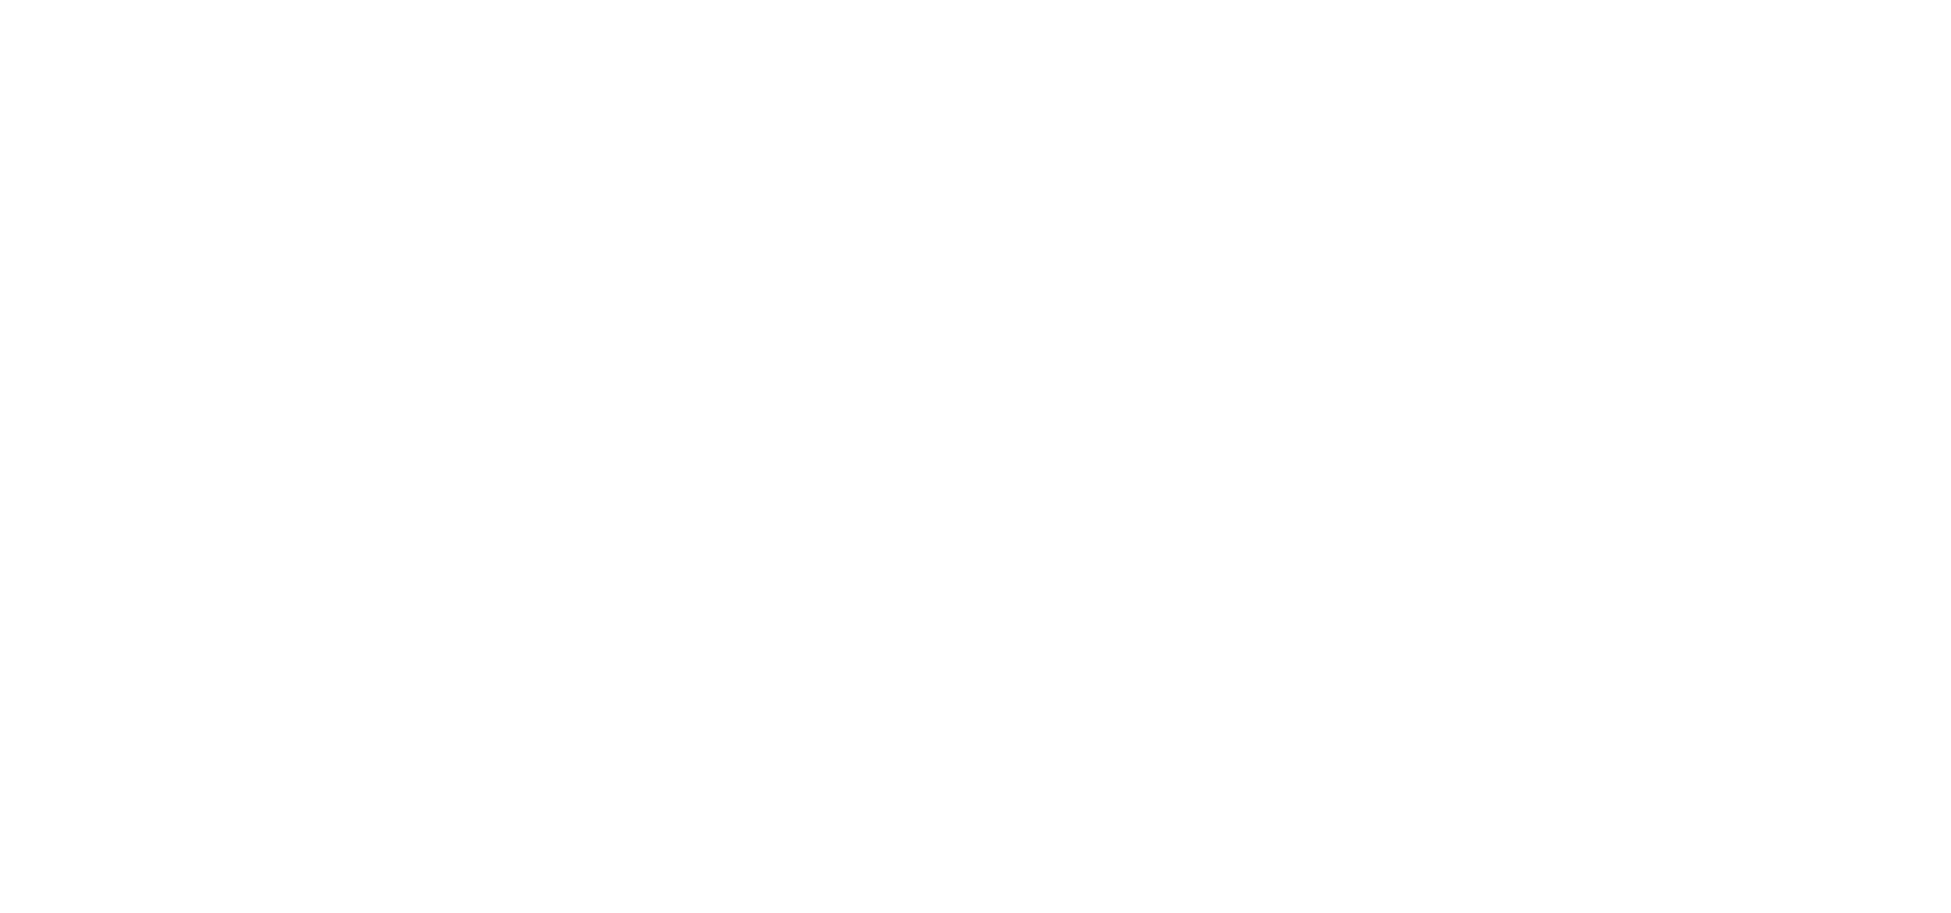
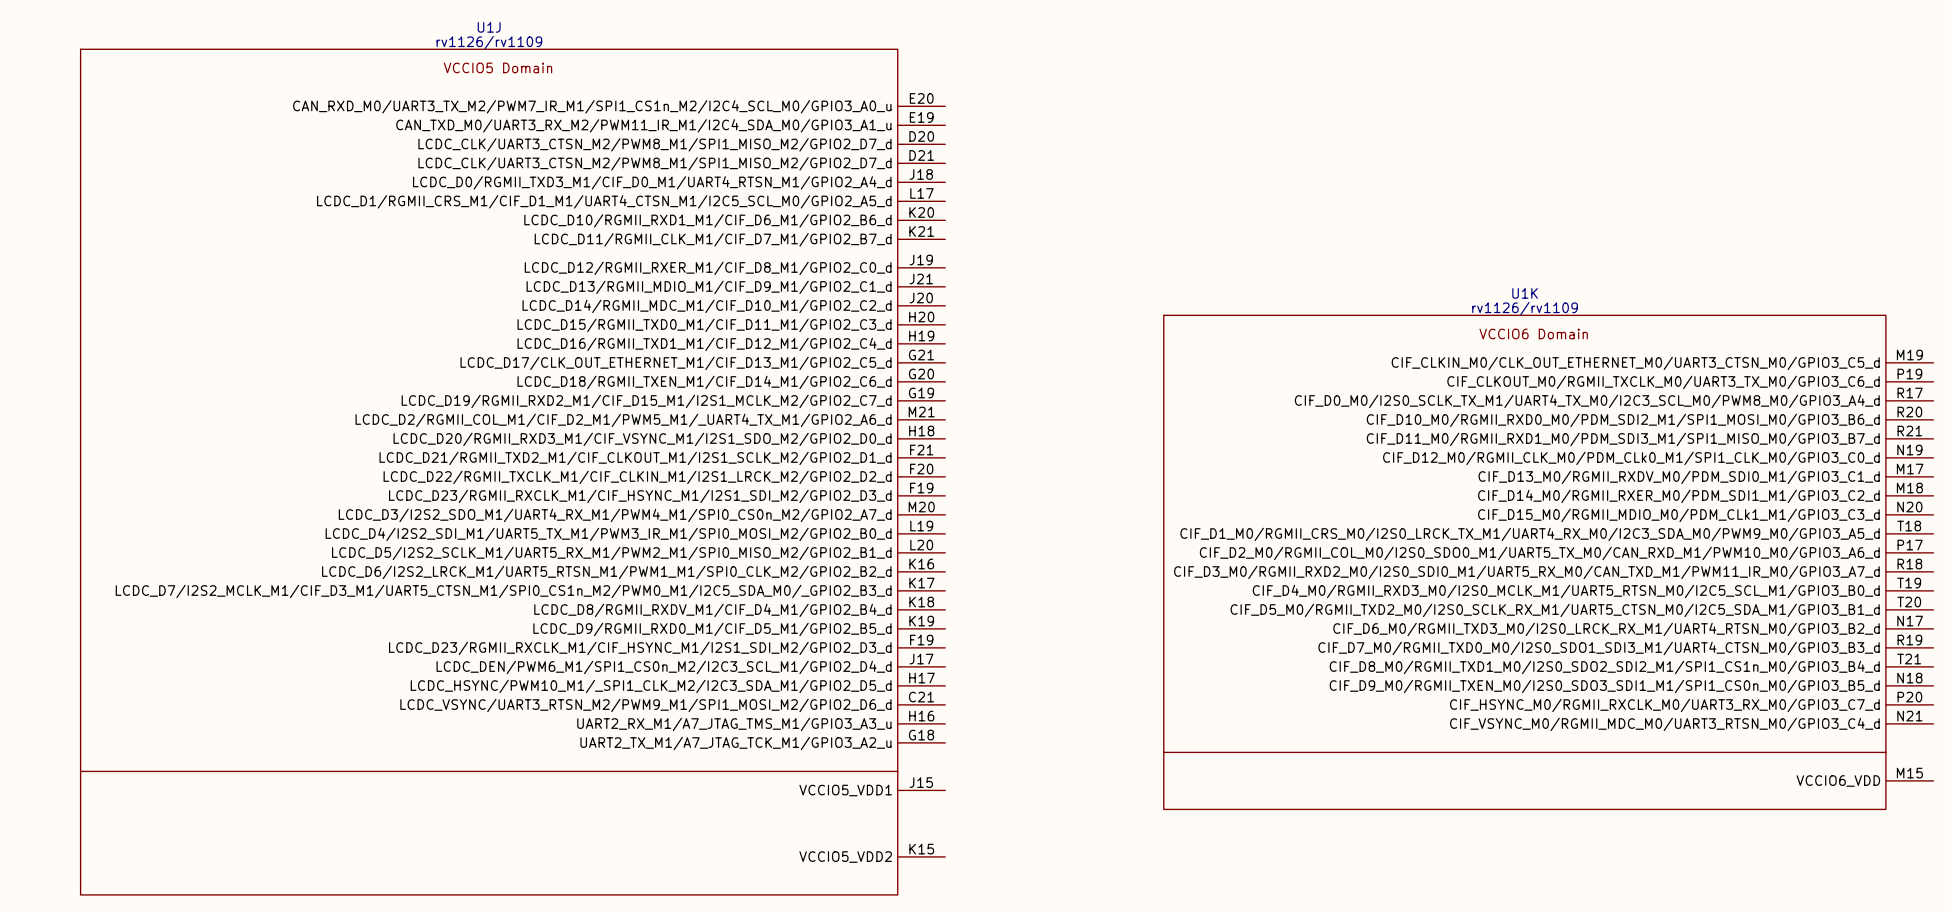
U1J: none -> rv1126/rv1109 (512, 472)
U1K: none -> rv1126/rv1109 (1548, 562)

